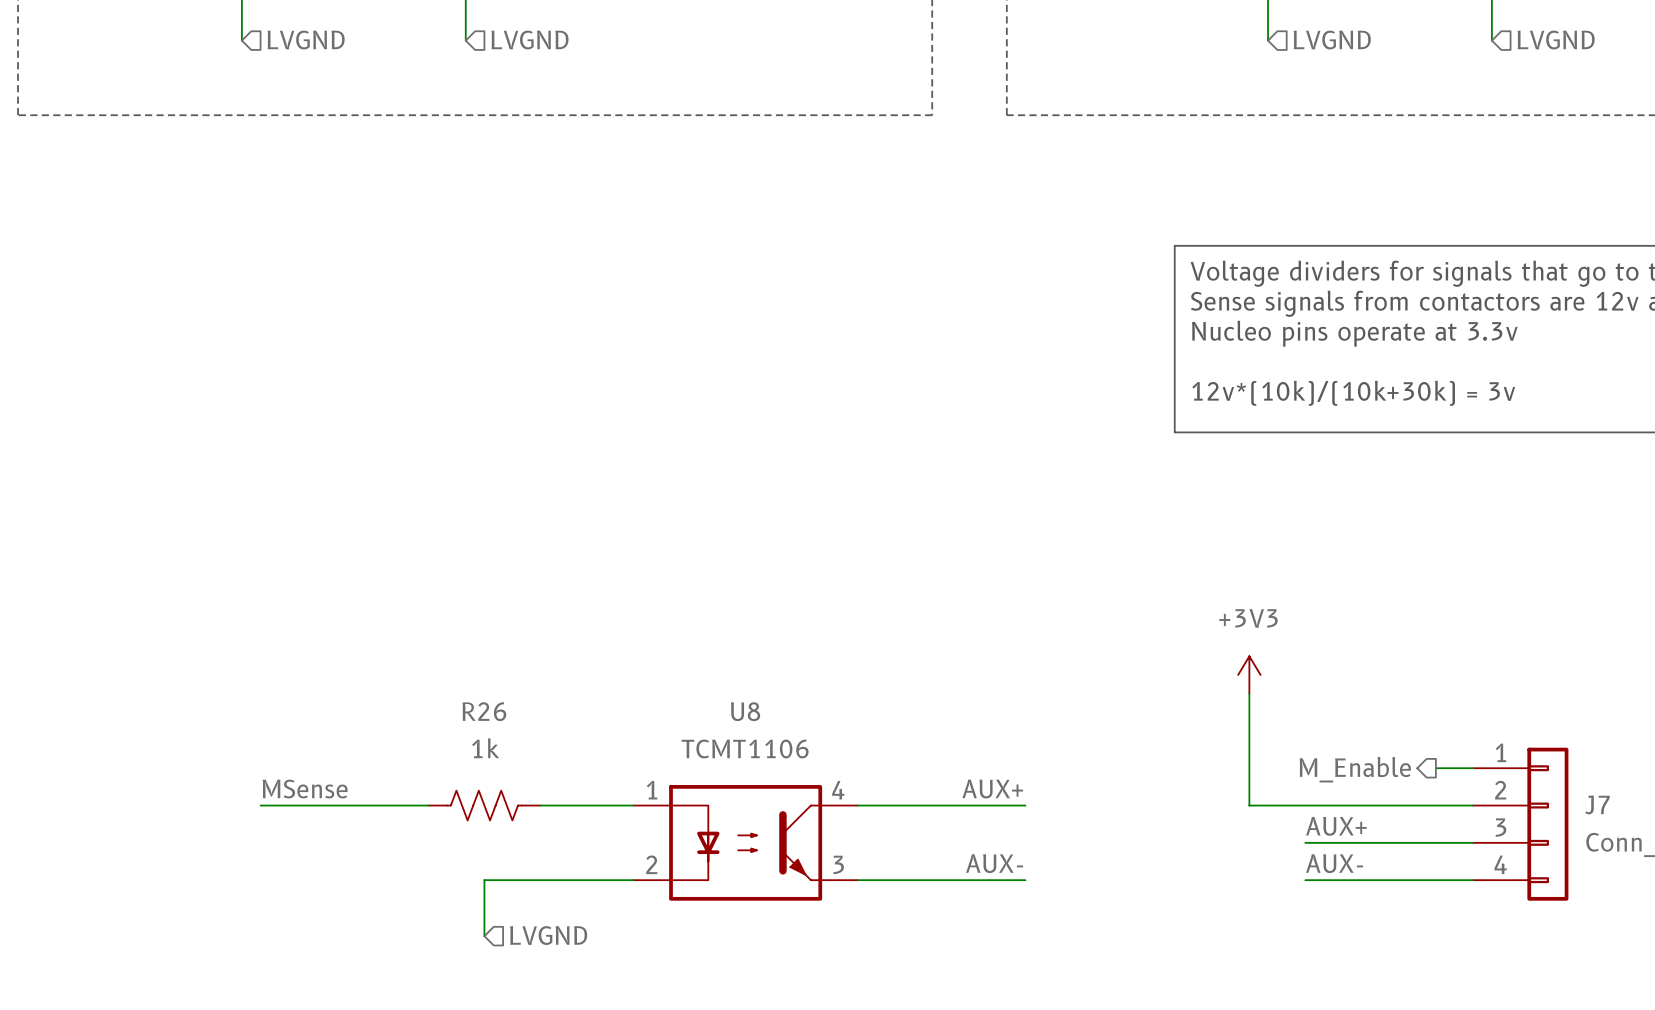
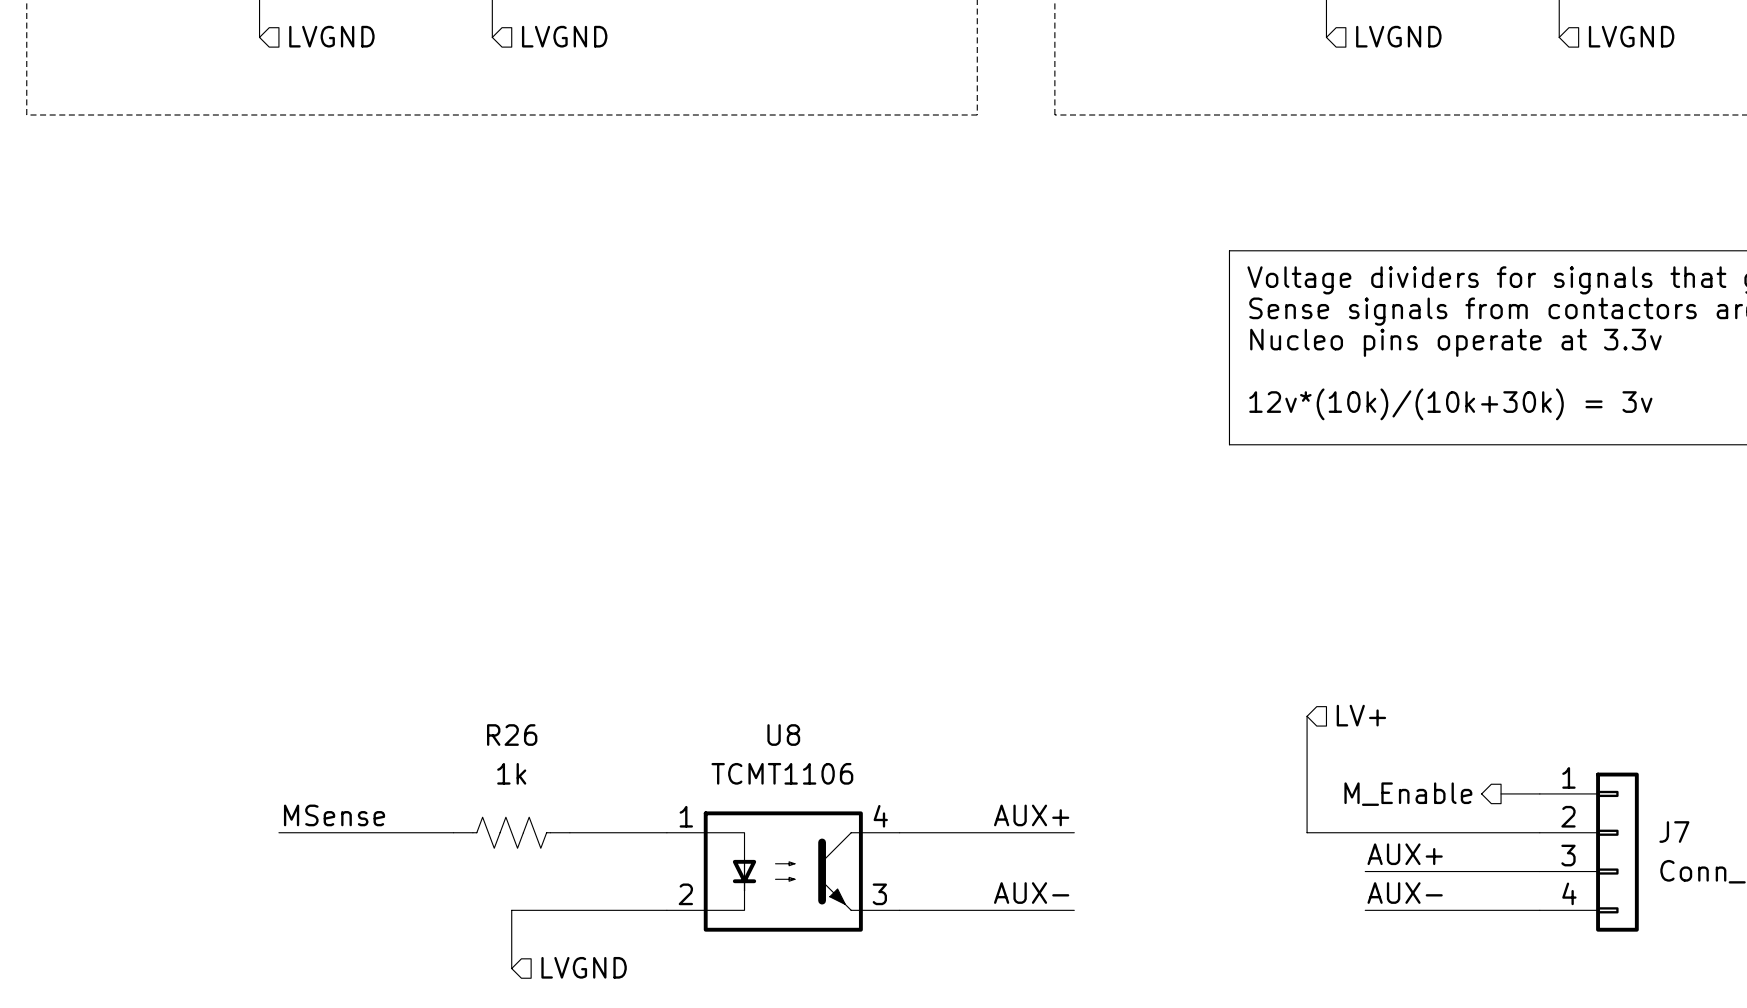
power symbol: +3V3 (1249, 674) -> none
hierarchical label: none -> LV+ (1361, 715)

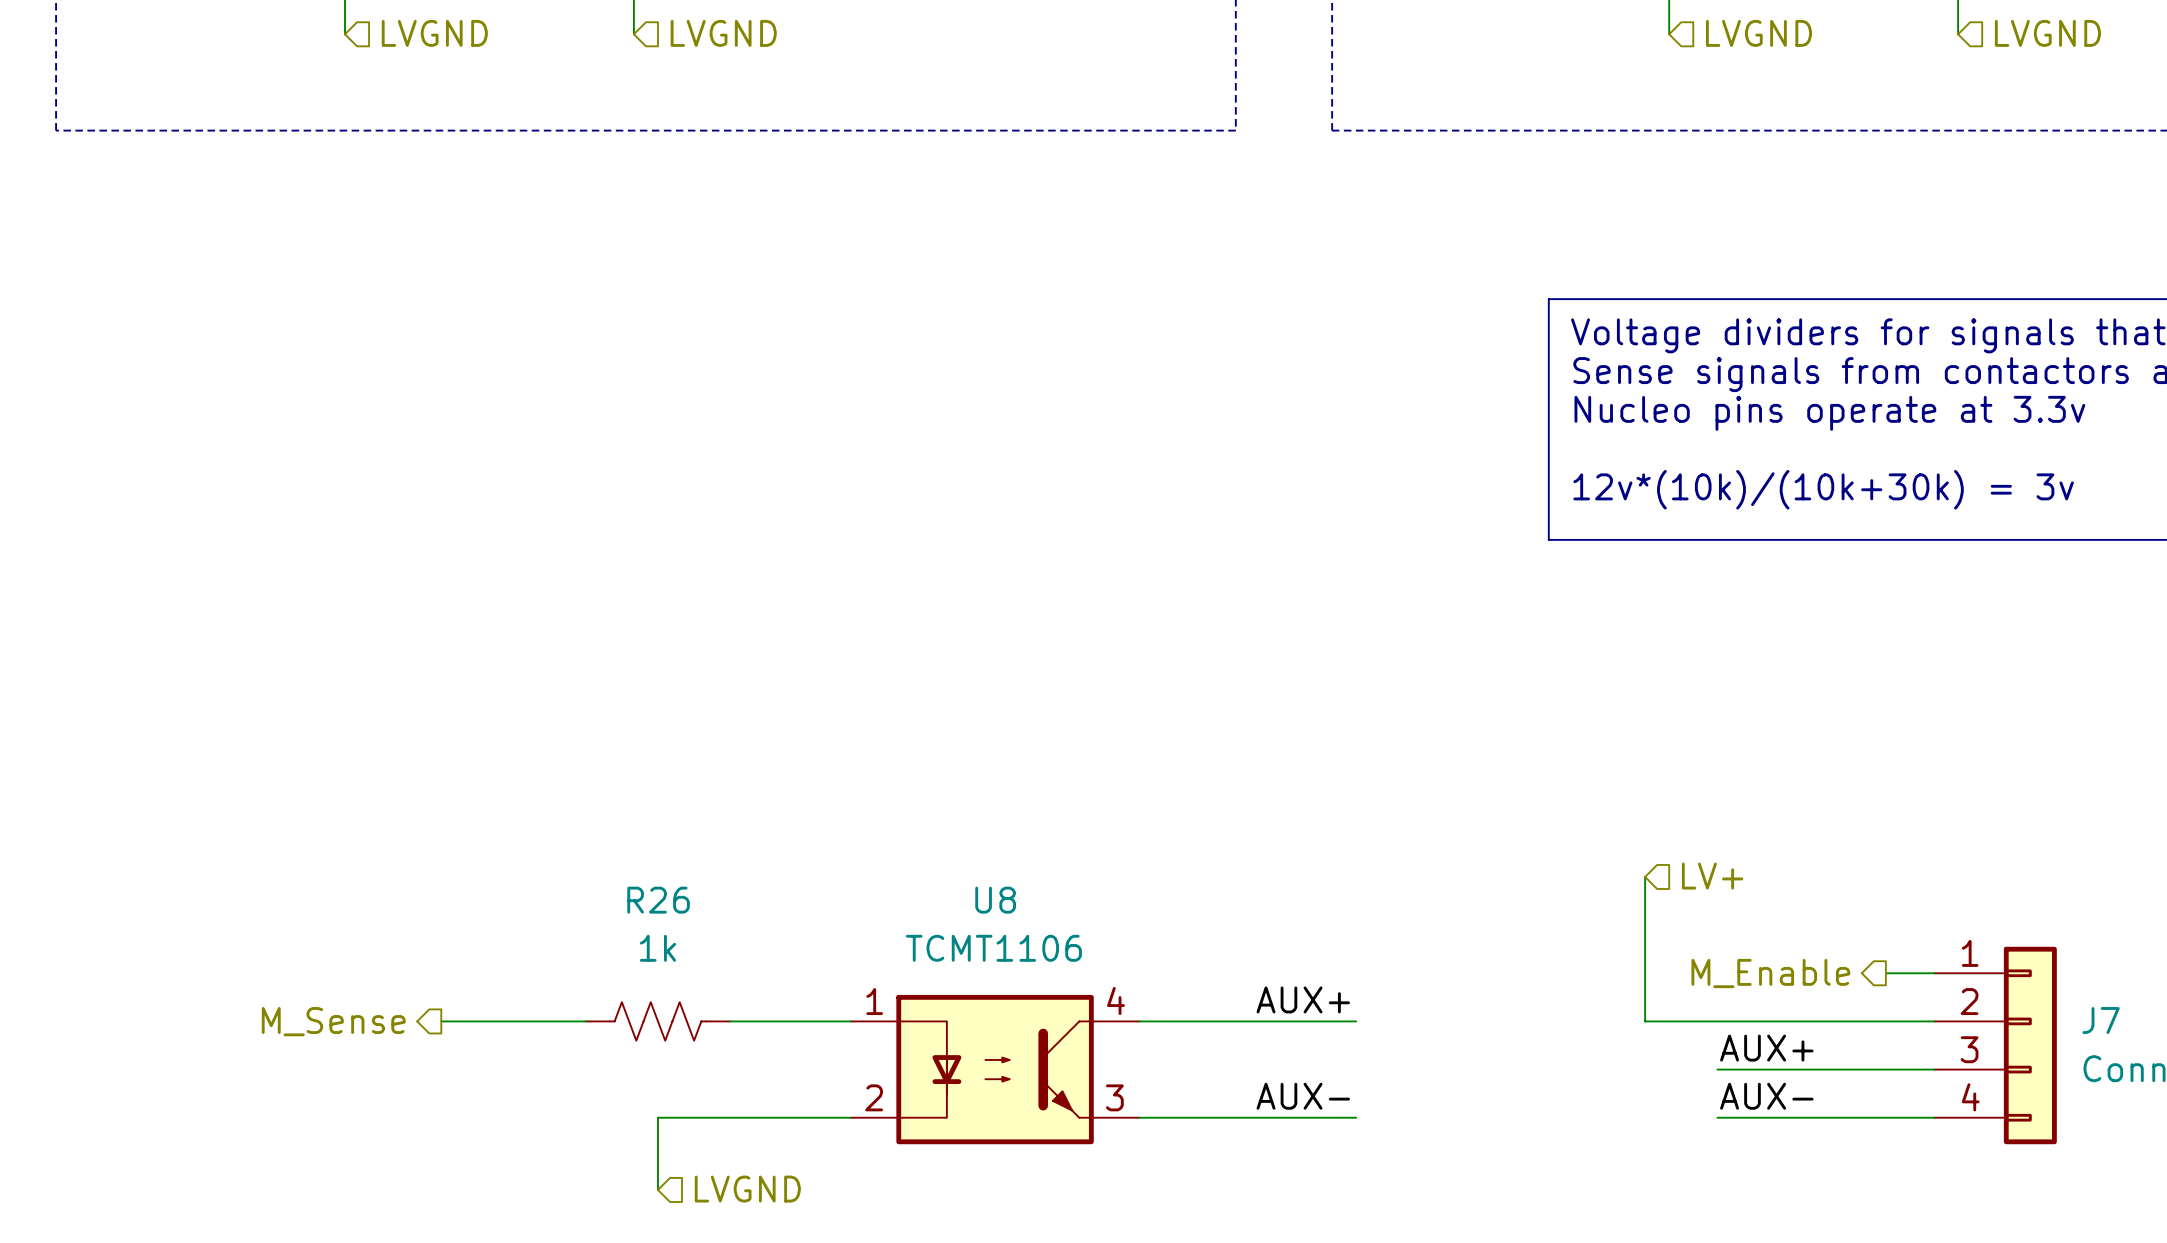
label: MSense (334, 815) -> none
hierarchical label: none -> M_Sense (333, 1021)
wire: (278, 832) (337, 832) -> none

